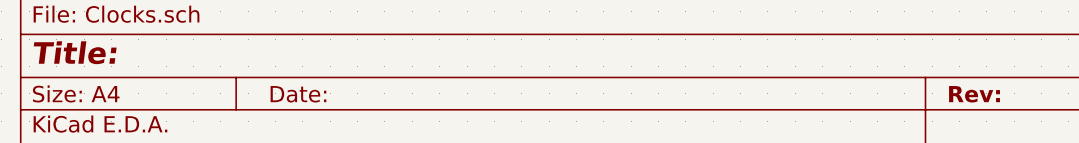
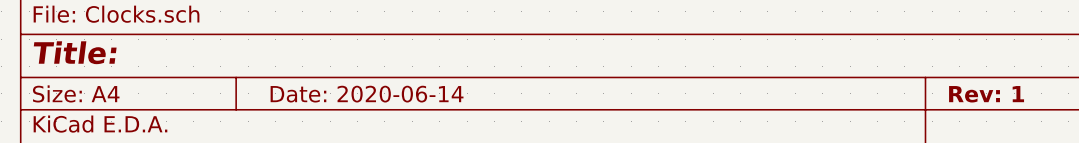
title block: Date: (298, 94) -> Date: 2020-06-14 (367, 94)
title block: Rev: (974, 94) -> Rev: 1 (986, 94)

